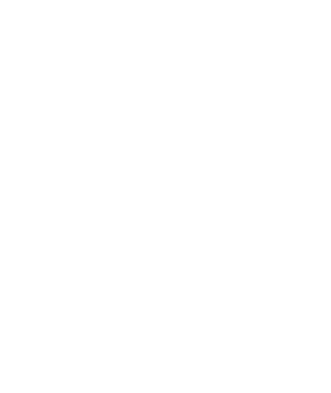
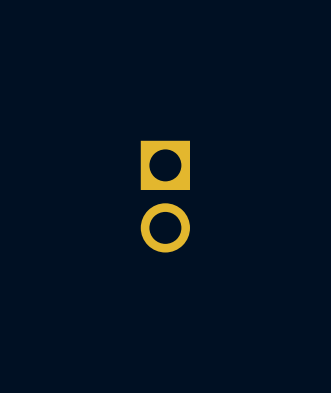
part: none -> (165, 196)

